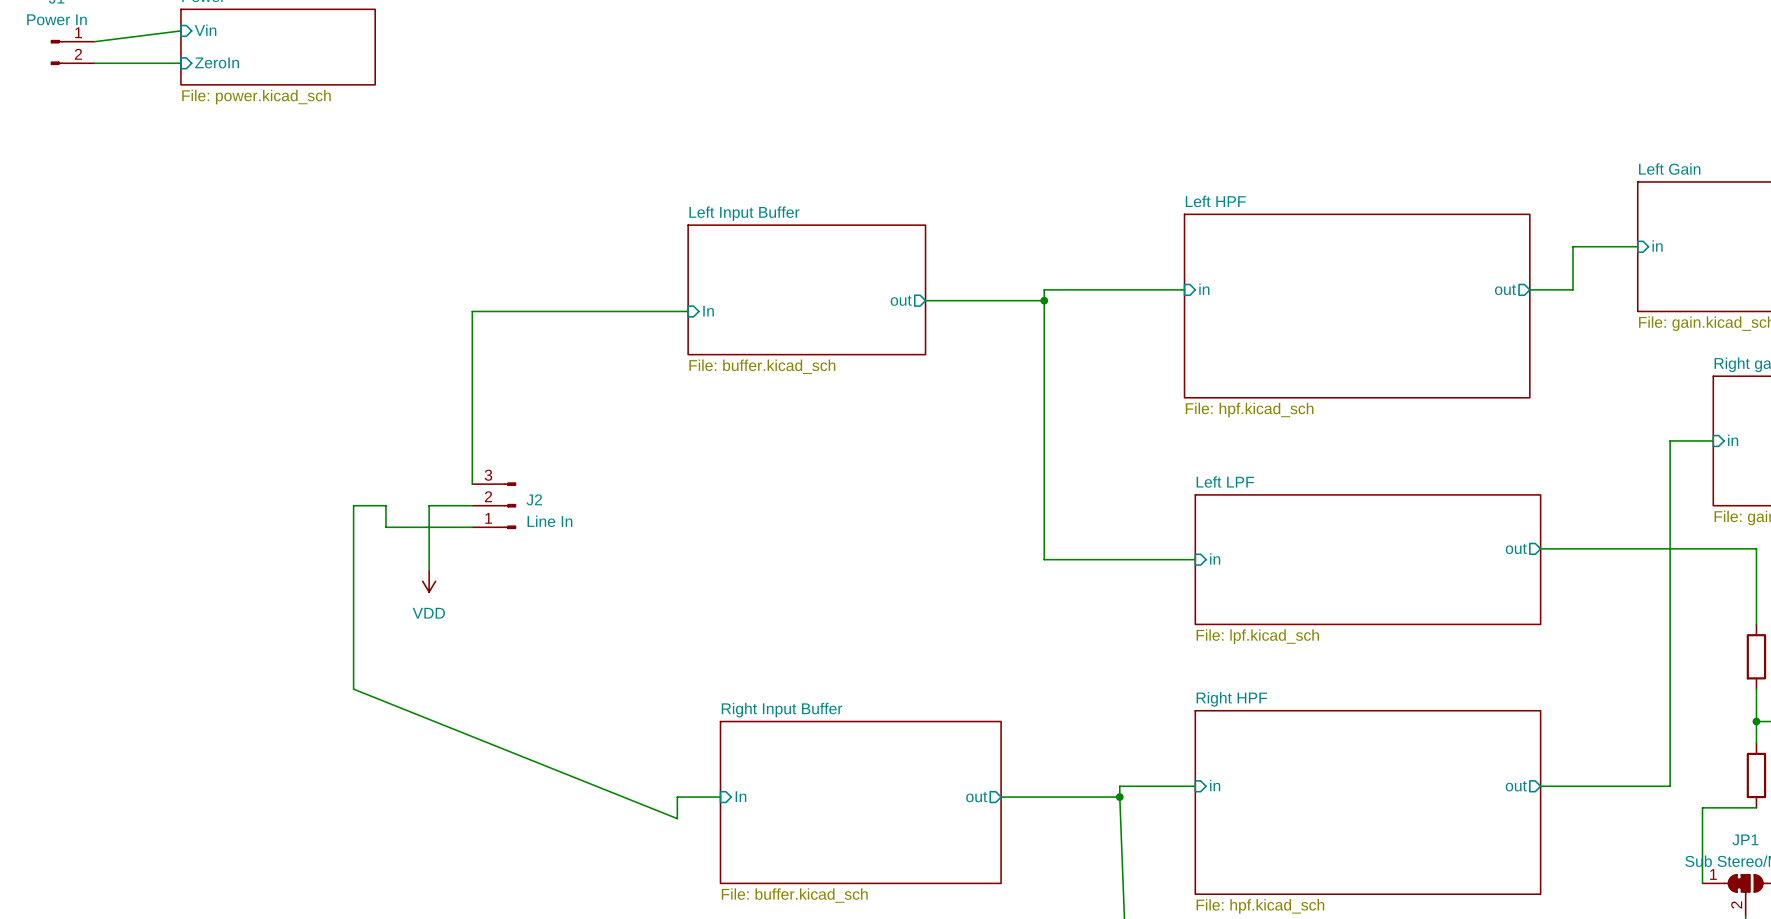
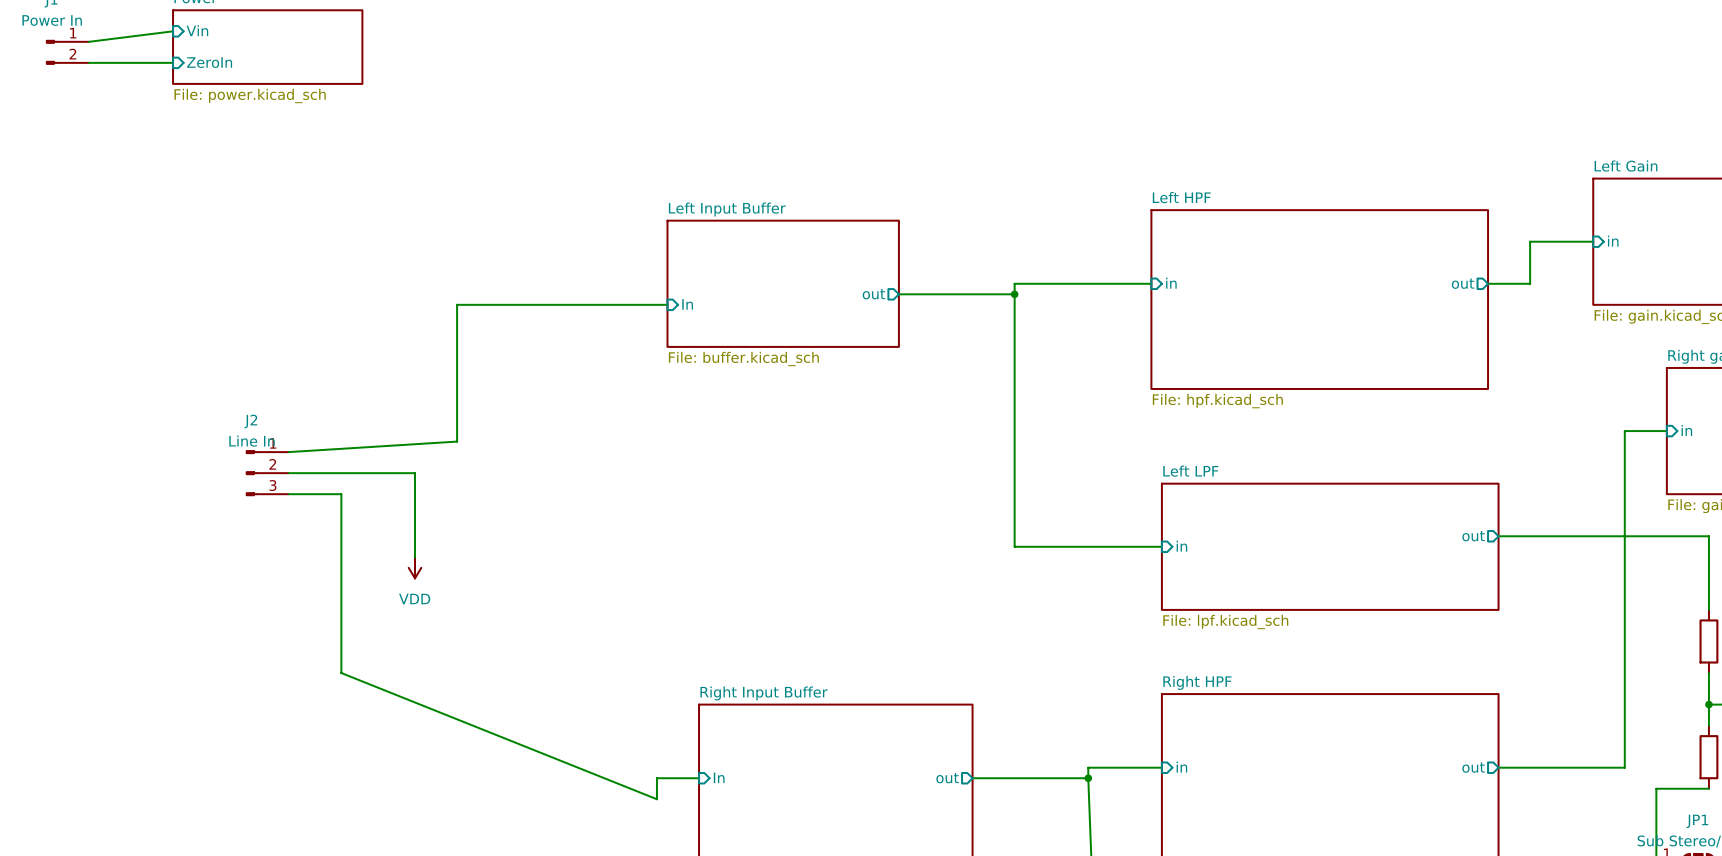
wire: (472, 451) (472, 484) -> (457, 441) (288, 452)
J2 name position: J2 (534, 499) -> J2 (250, 421)
wire: (353, 505) (385, 505) (385, 527) (472, 527) -> (341, 494) (288, 494)
wire: (429, 505) (472, 505) -> (415, 494) (415, 473) (288, 473)
J2 position: (494, 505) -> (267, 473)
J2 rotation: 0° (510, 505) -> 180° (251, 473)
J2 value position: Line In (549, 521) -> Line In (252, 441)

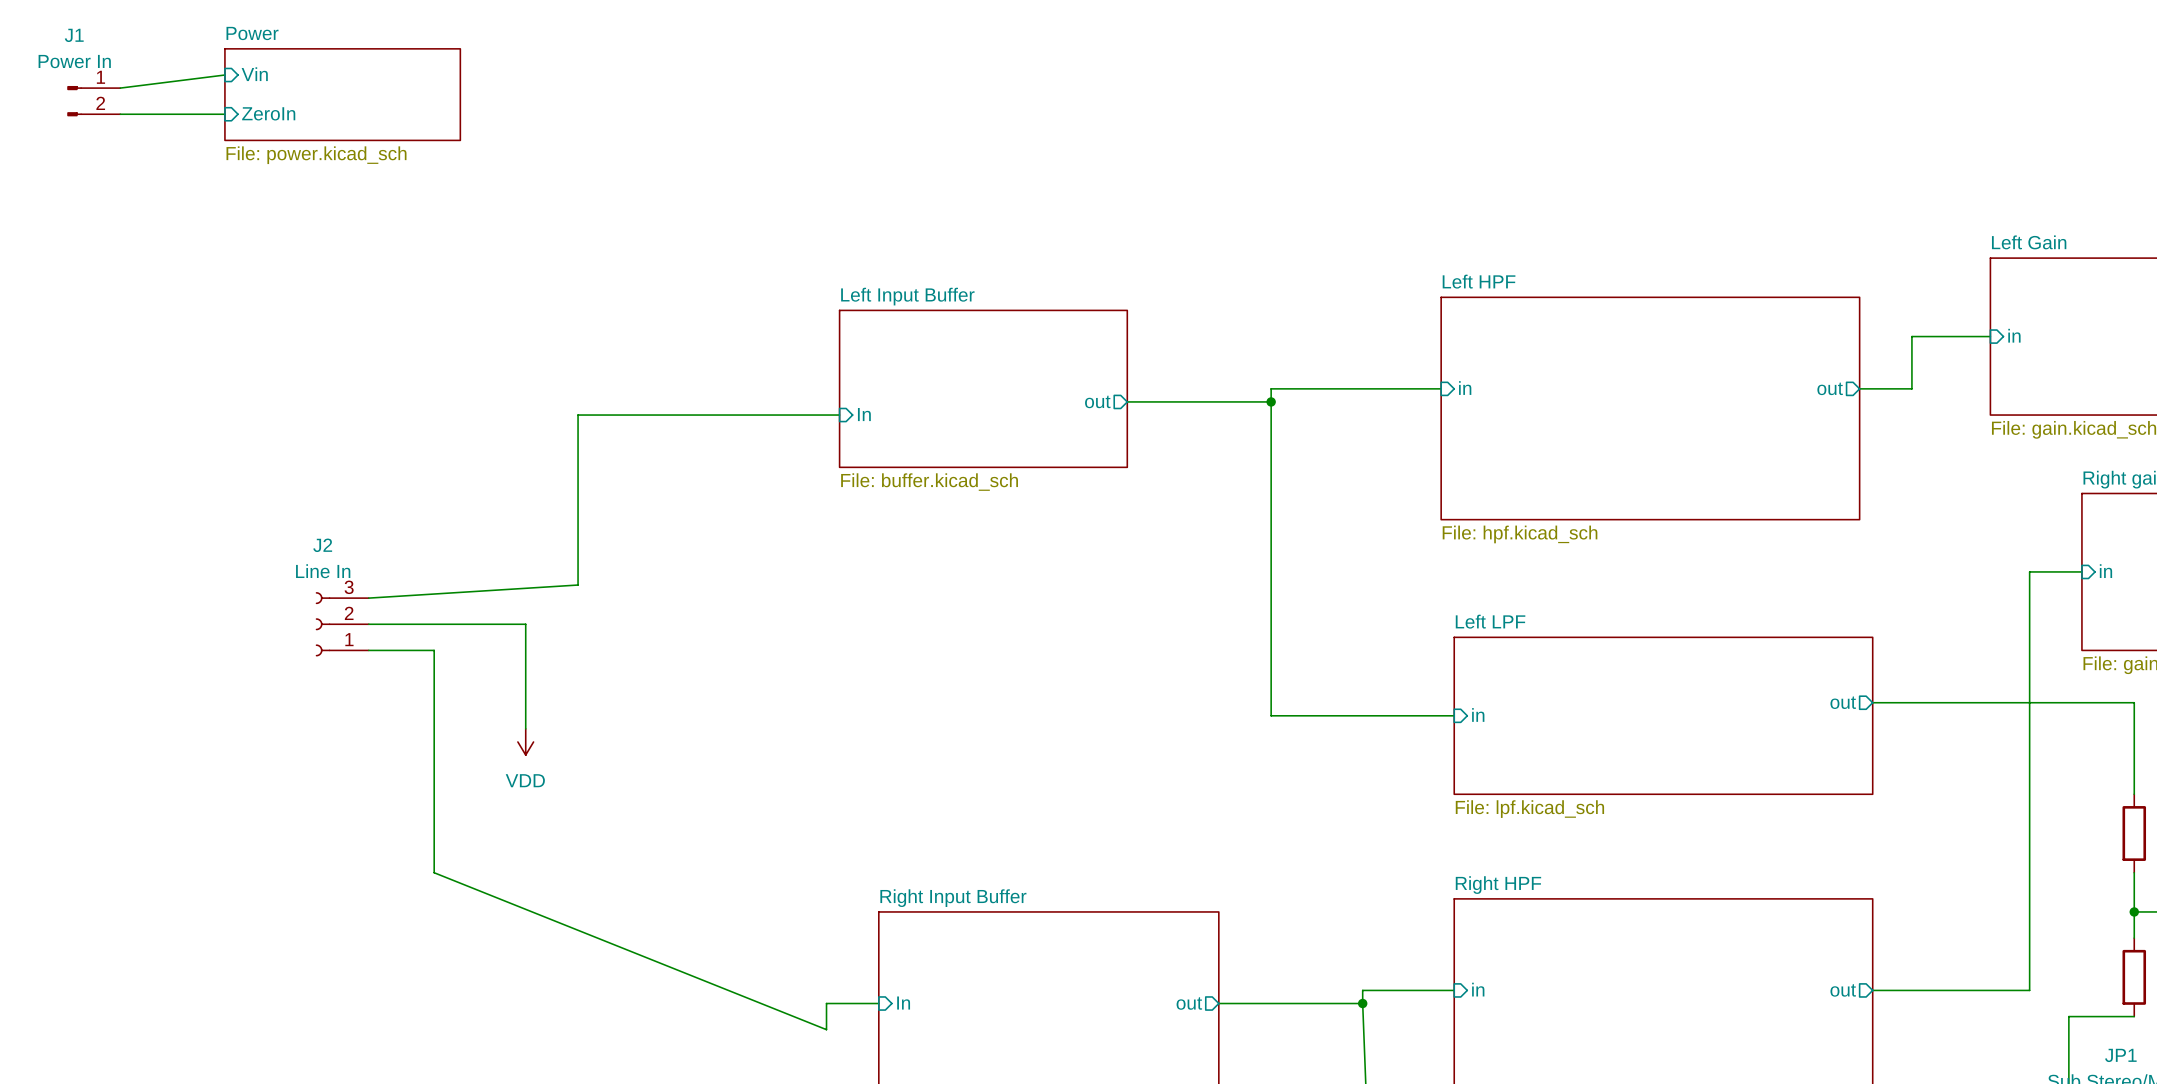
J2 symbol: [246, 450, 289, 496] -> [315, 592, 369, 657]

